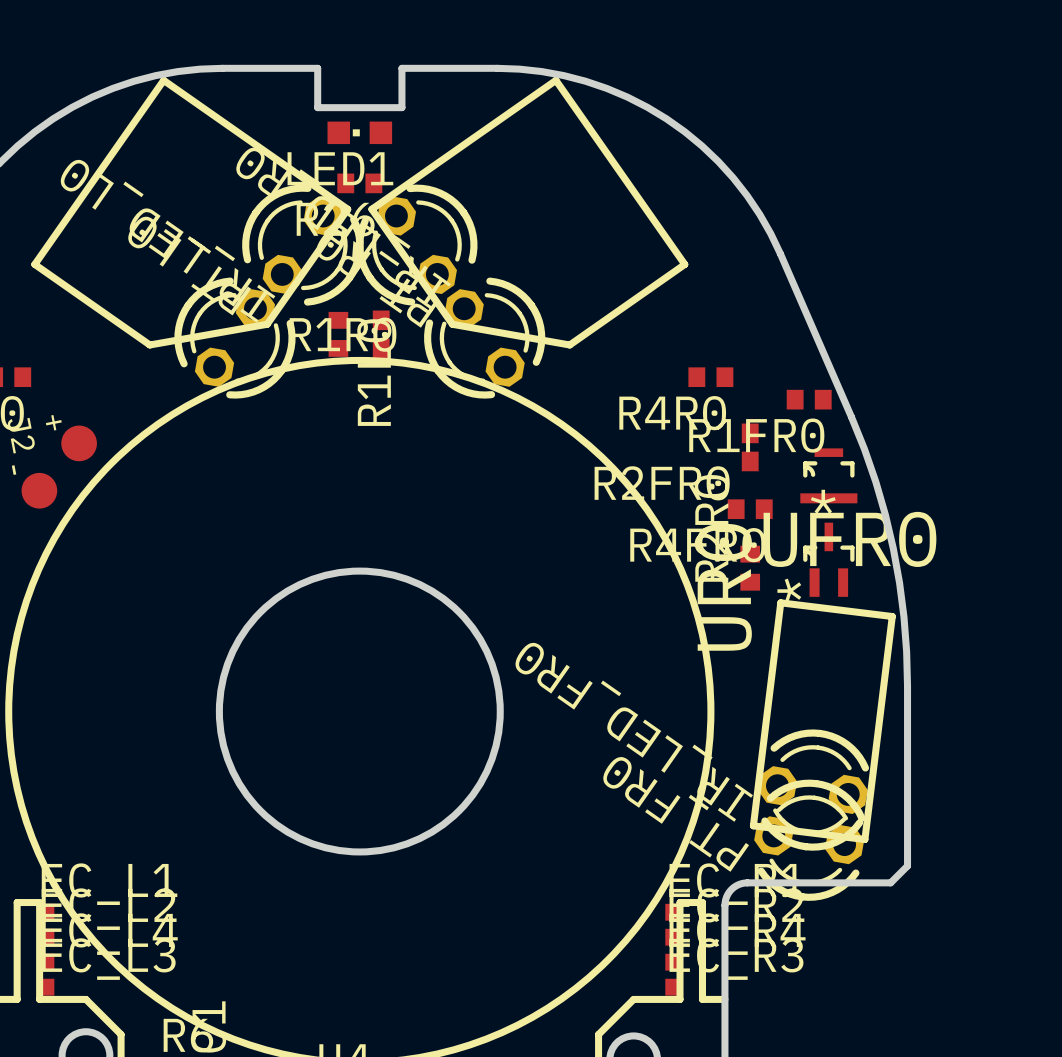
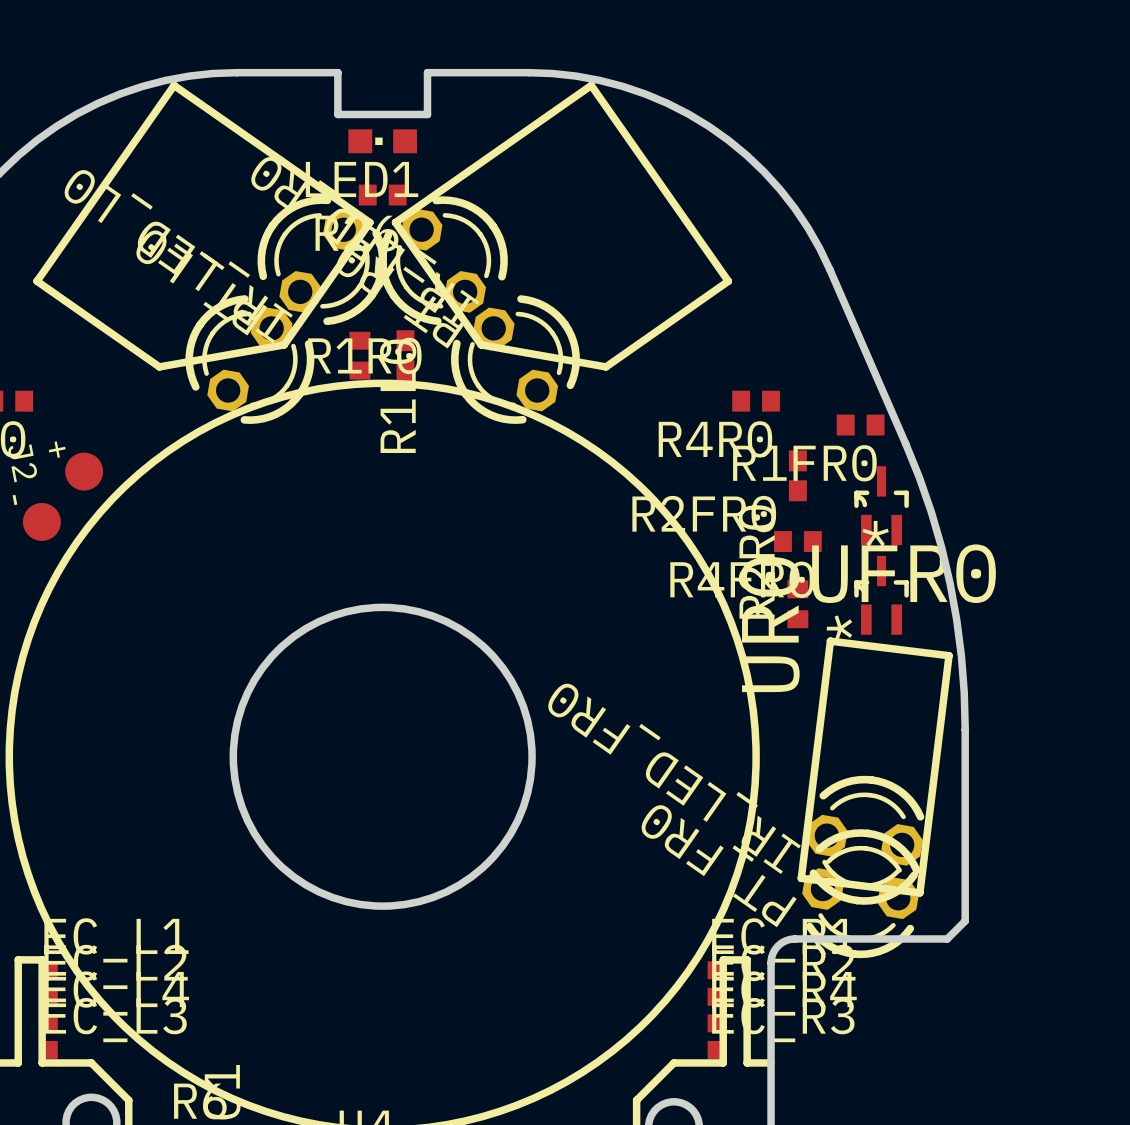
UFR0 footprint: [800, 448, 858, 504] -> [854, 466, 909, 546]

